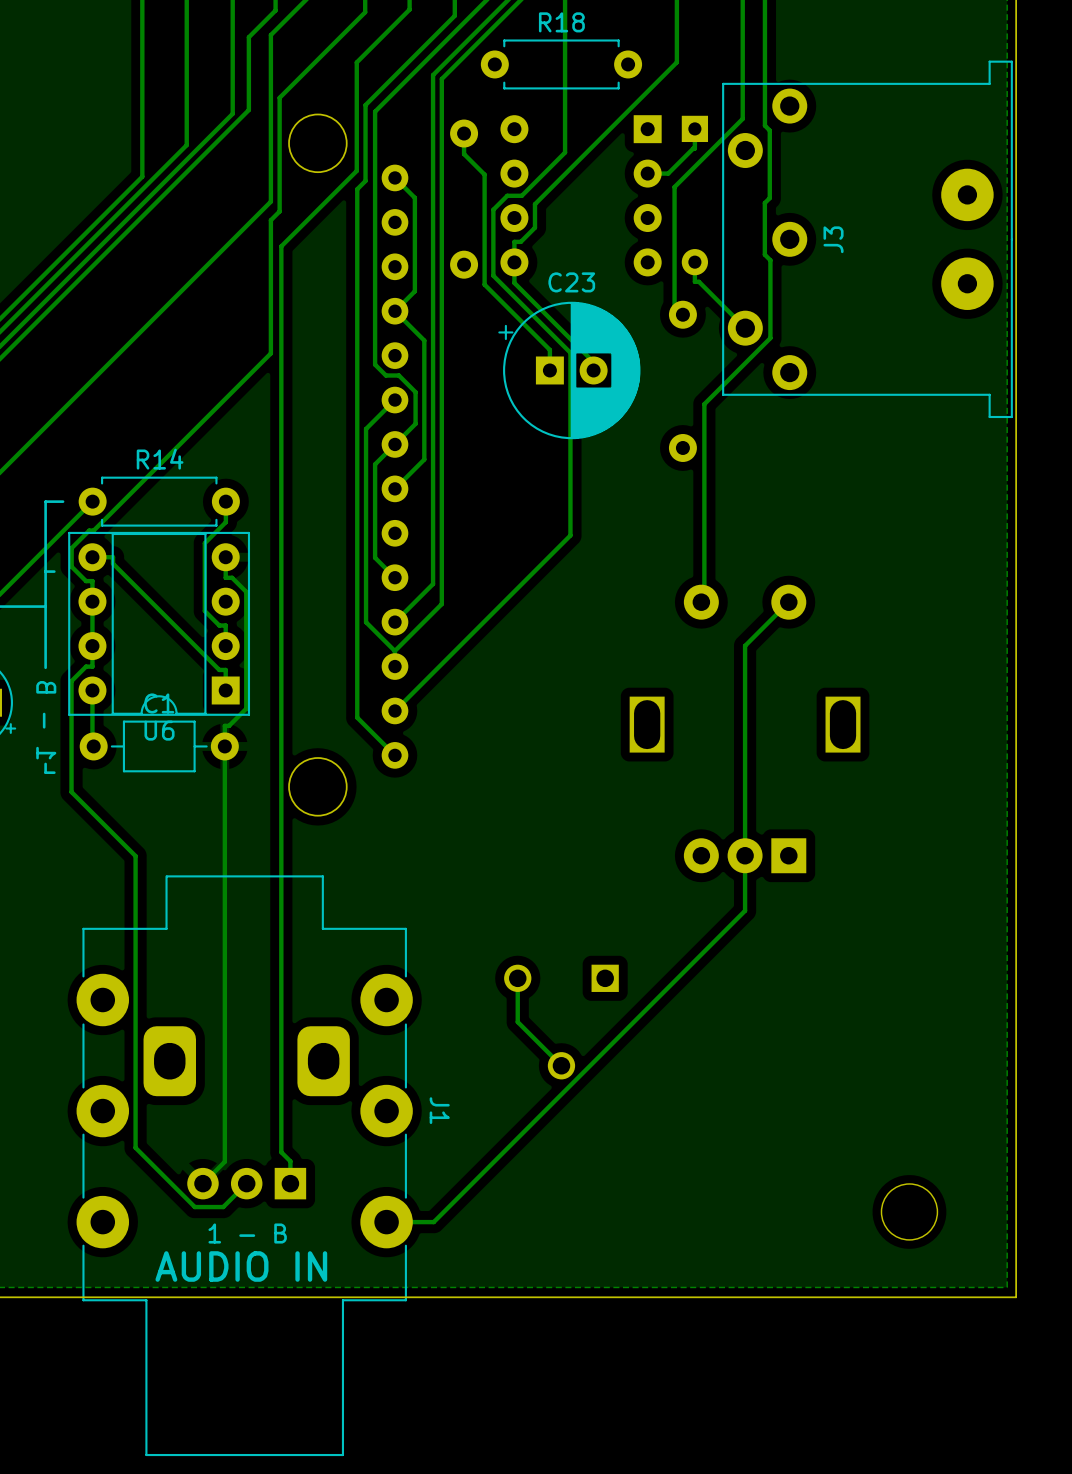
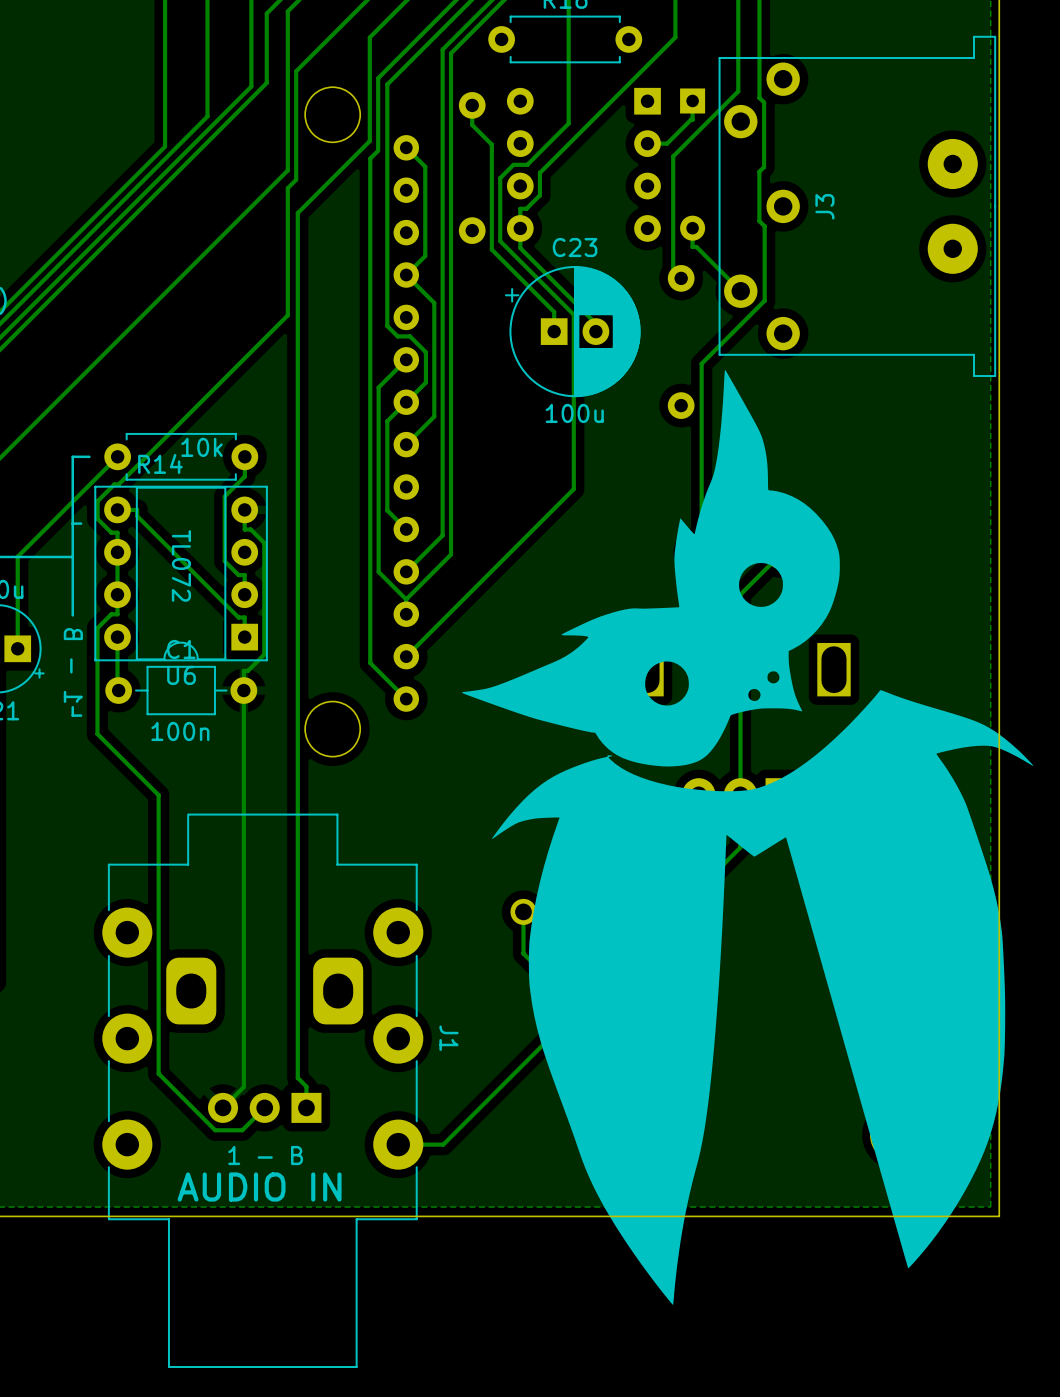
drawing: none -> [462, 370, 1034, 1306]
text: none -> 100u (574, 413)
R14 name position: R14 (160, 459) -> R14 (160, 463)
text: none -> 10k (202, 447)
text: none -> TL072 (181, 565)
text: none -> 100n (180, 731)

